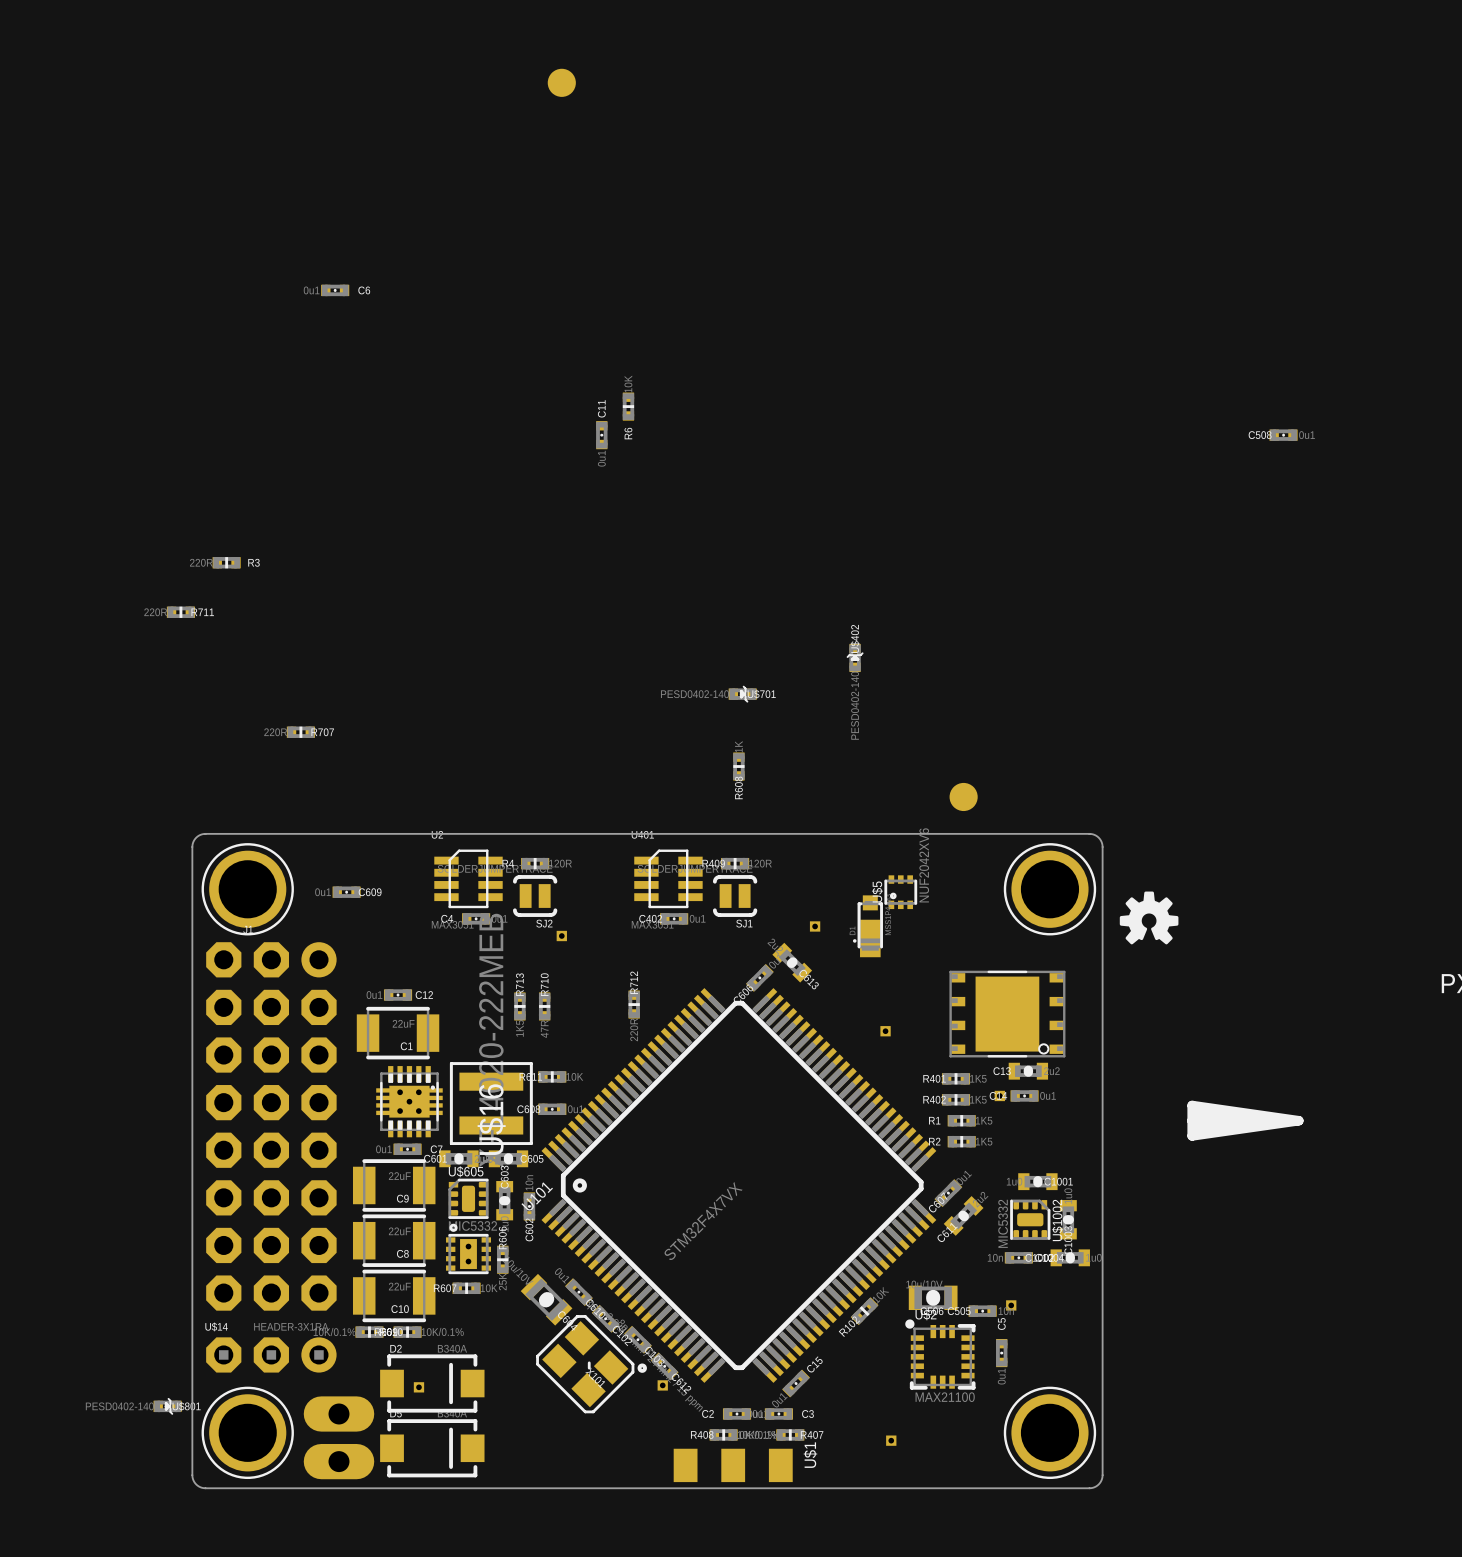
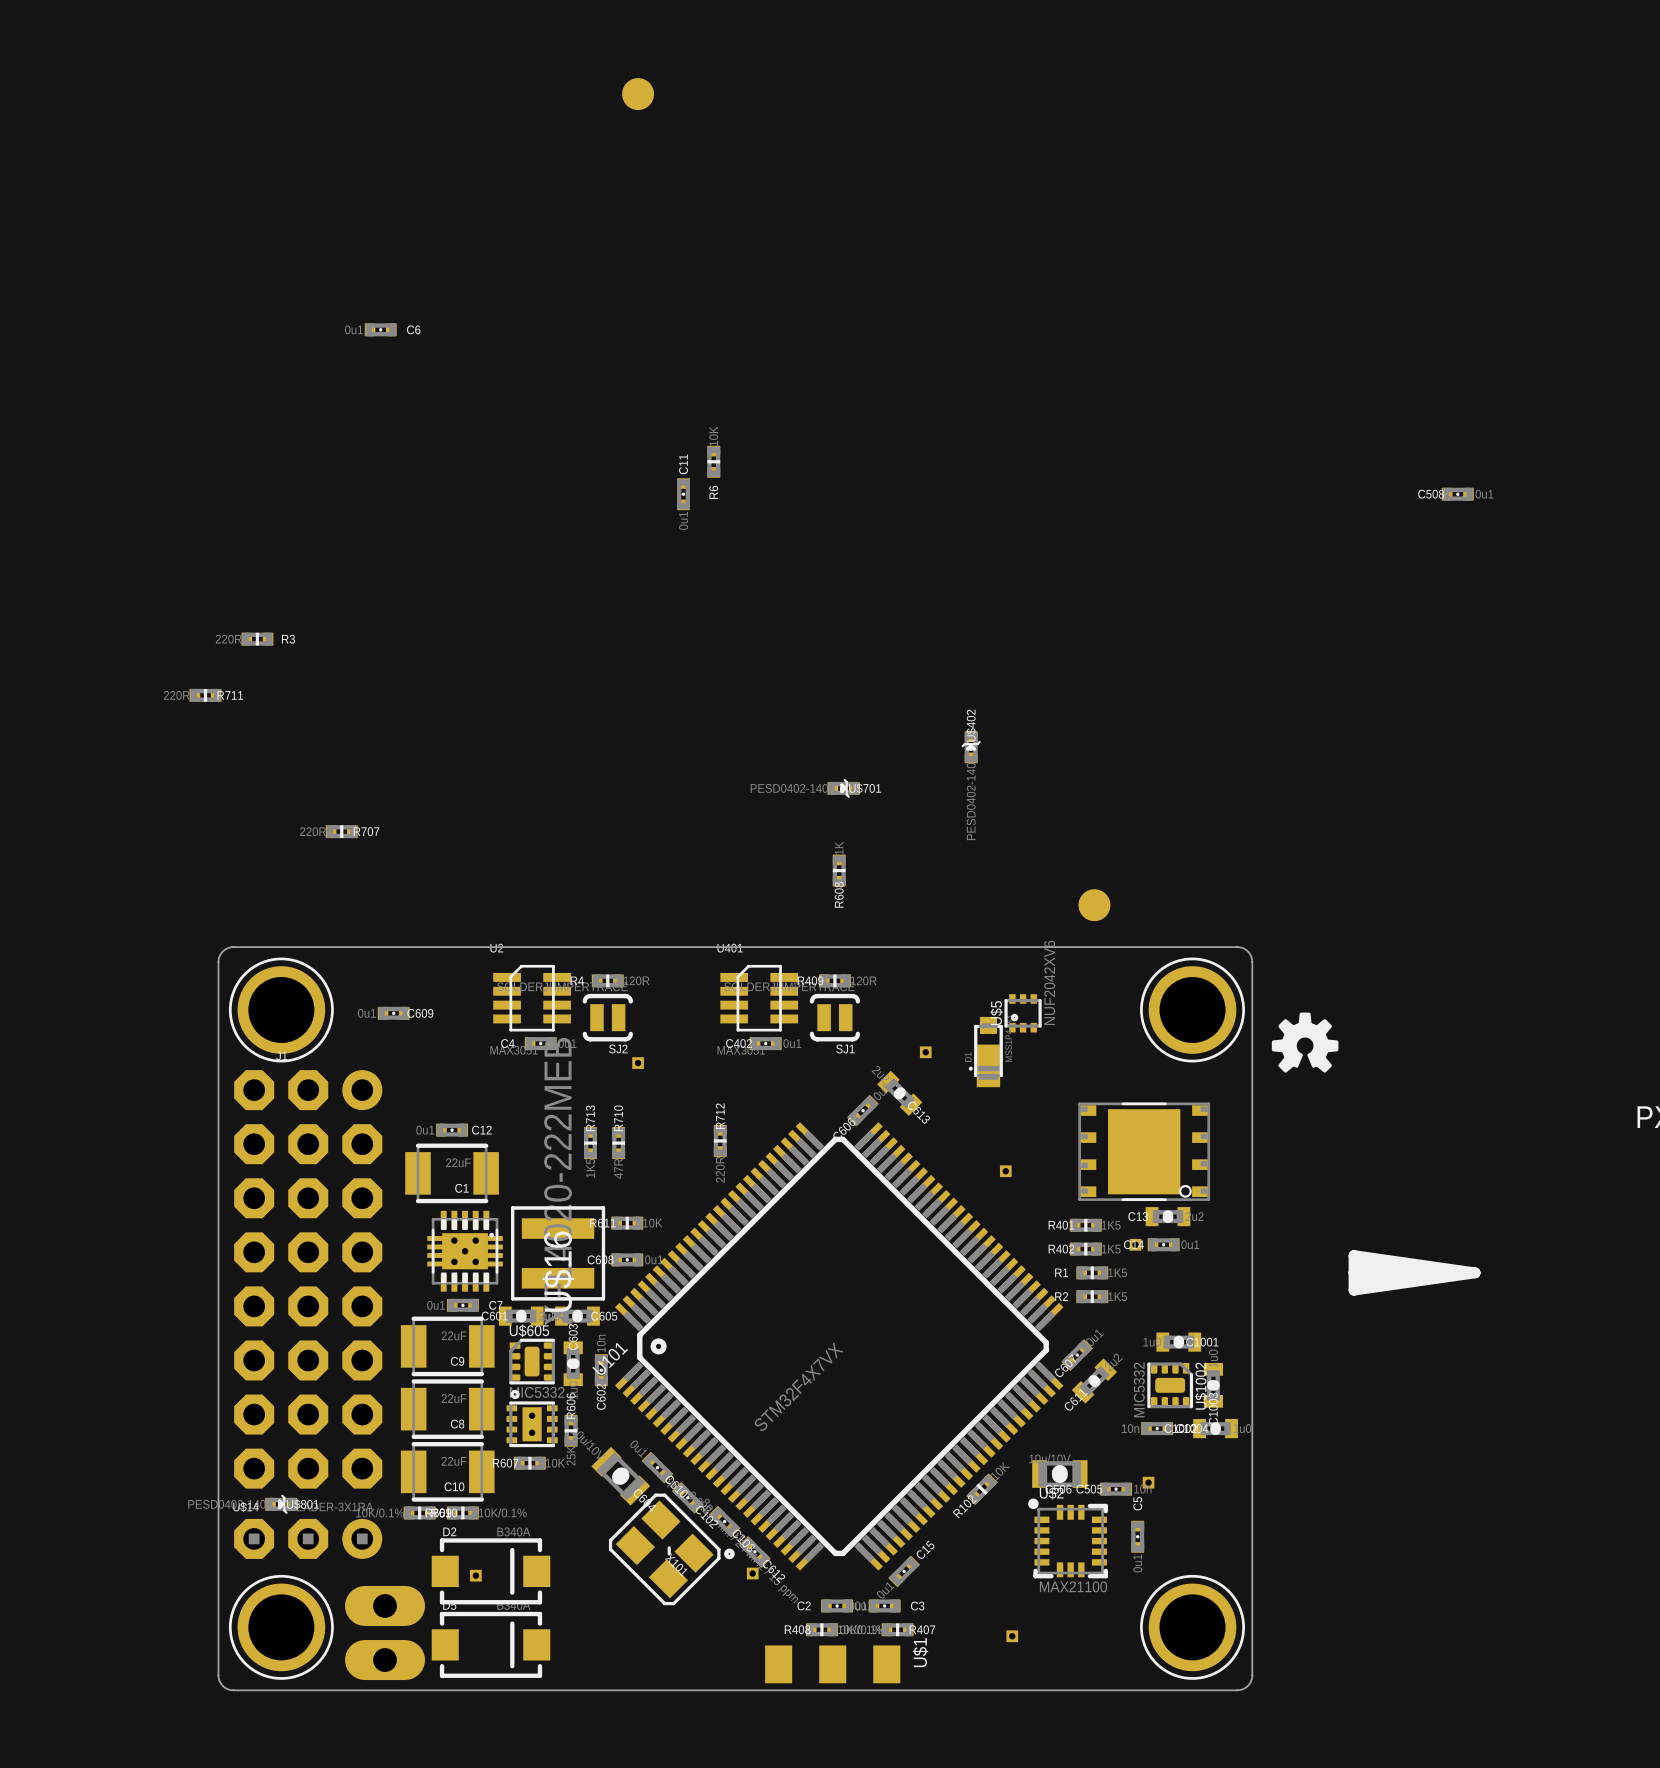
U$801 position: (167, 1406) -> (281, 1504)

